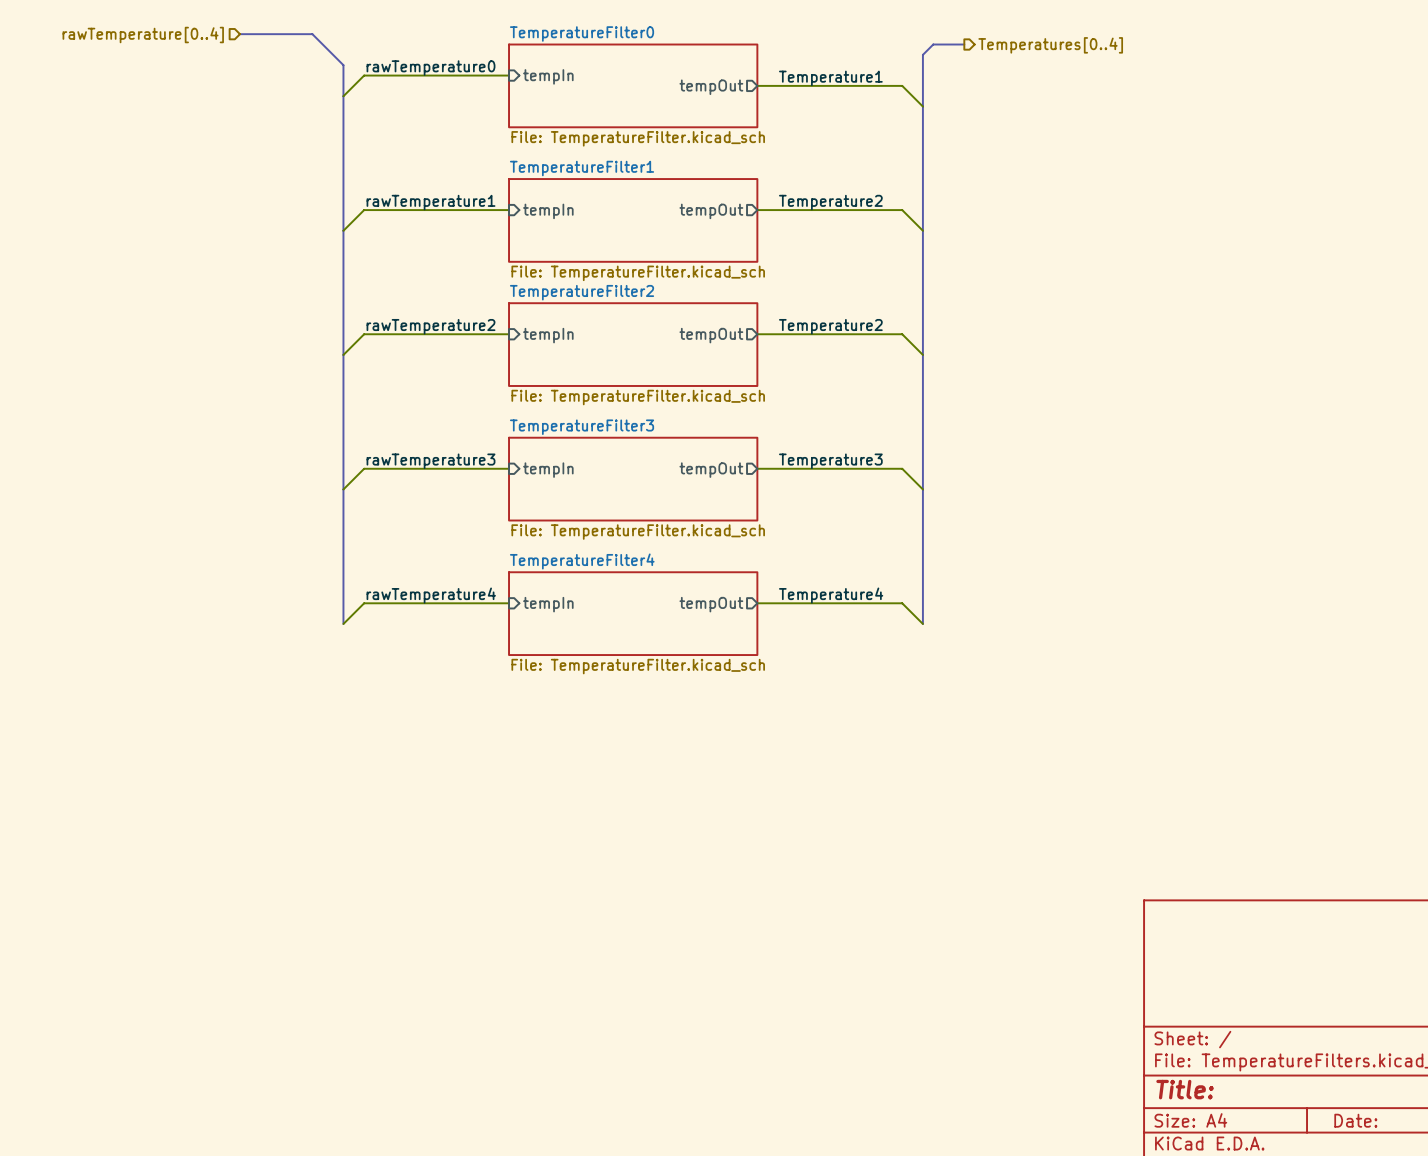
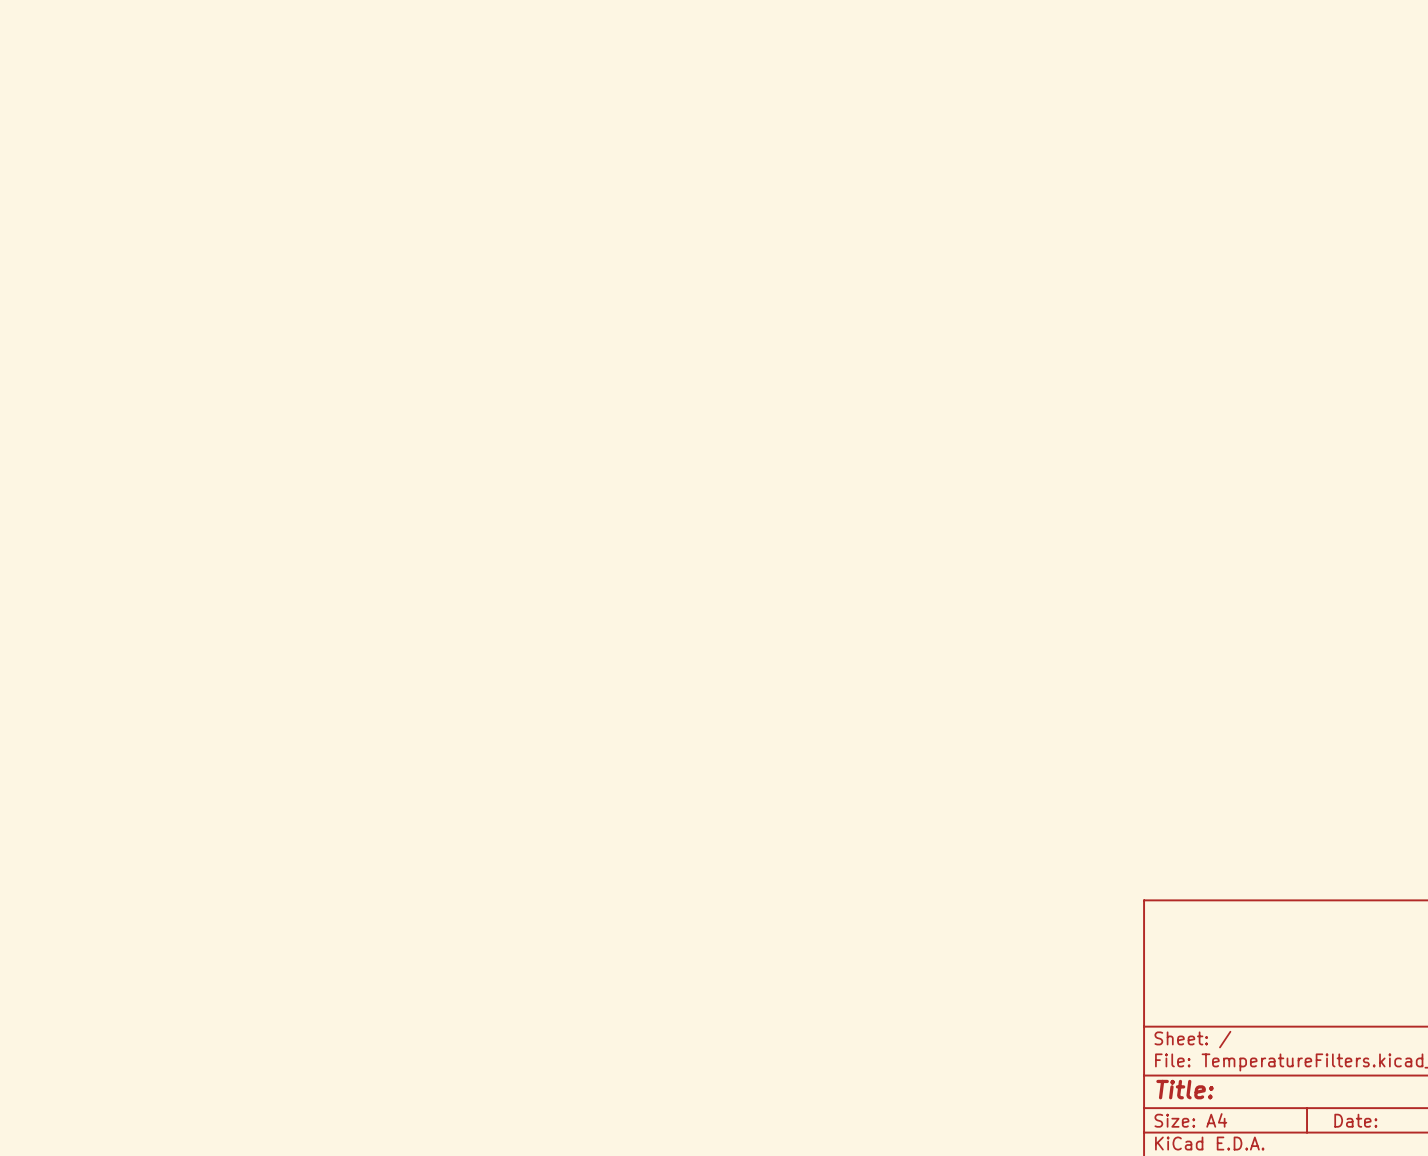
bus: (239, 34) (312, 34) (343, 65) (343, 623) -> none
hierarchical label: rawTemperature[0..4] (143, 35) -> none
bus: (964, 44) (933, 44) (922, 54) (922, 623) -> none
hierarchical label: Temperatures[0..4] (1050, 45) -> none
label: rawTemperature0 (430, 68) -> none
wire: (509, 75) (364, 75) (343, 96) -> none
sheet pin: tempIn (548, 76) -> none
label: Temperature1 (830, 78) -> none
sheet TemperatureFilter0: File: TemperatureFilter.kicad_sch (633, 85) -> none
wire: (757, 85) (902, 85) (922, 106) -> none
sheet pin: tempOut (711, 87) -> none
label: rawTemperature1 (430, 202) -> none
label: Temperature2 (830, 202) -> none
wire: (509, 210) (364, 210) (343, 230) -> none
wire: (757, 210) (902, 210) (922, 230) -> none
sheet pin: tempIn (548, 211) -> none
sheet pin: tempOut (711, 211) -> none
sheet TemperatureFilter1: File: TemperatureFilter.kicad_sch (633, 220) -> none
label: rawTemperature2 (430, 326) -> none
label: Temperature2 (830, 326) -> none
wire: (509, 334) (364, 334) (343, 354) -> none
wire: (757, 334) (902, 334) (922, 354) -> none
sheet pin: tempIn (548, 335) -> none
sheet pin: tempOut (711, 335) -> none
sheet TemperatureFilter2: File: TemperatureFilter.kicad_sch (633, 344) -> none
label: rawTemperature3 (430, 461) -> none
label: Temperature3 (830, 461) -> none
wire: (509, 468) (364, 468) (343, 489) -> none
wire: (757, 468) (902, 468) (922, 489) -> none
sheet pin: tempIn (548, 470) -> none
sheet pin: tempOut (711, 470) -> none
sheet TemperatureFilter3: File: TemperatureFilter.kicad_sch (633, 479) -> none
label: rawTemperature4 (431, 595) -> none
label: Temperature4 (831, 595) -> none
wire: (509, 603) (364, 603) (343, 623) -> none
wire: (757, 603) (902, 603) (922, 623) -> none
sheet pin: tempIn (548, 604) -> none
sheet pin: tempOut (711, 604) -> none
sheet TemperatureFilter4: File: TemperatureFilter.kicad_sch (633, 613) -> none

